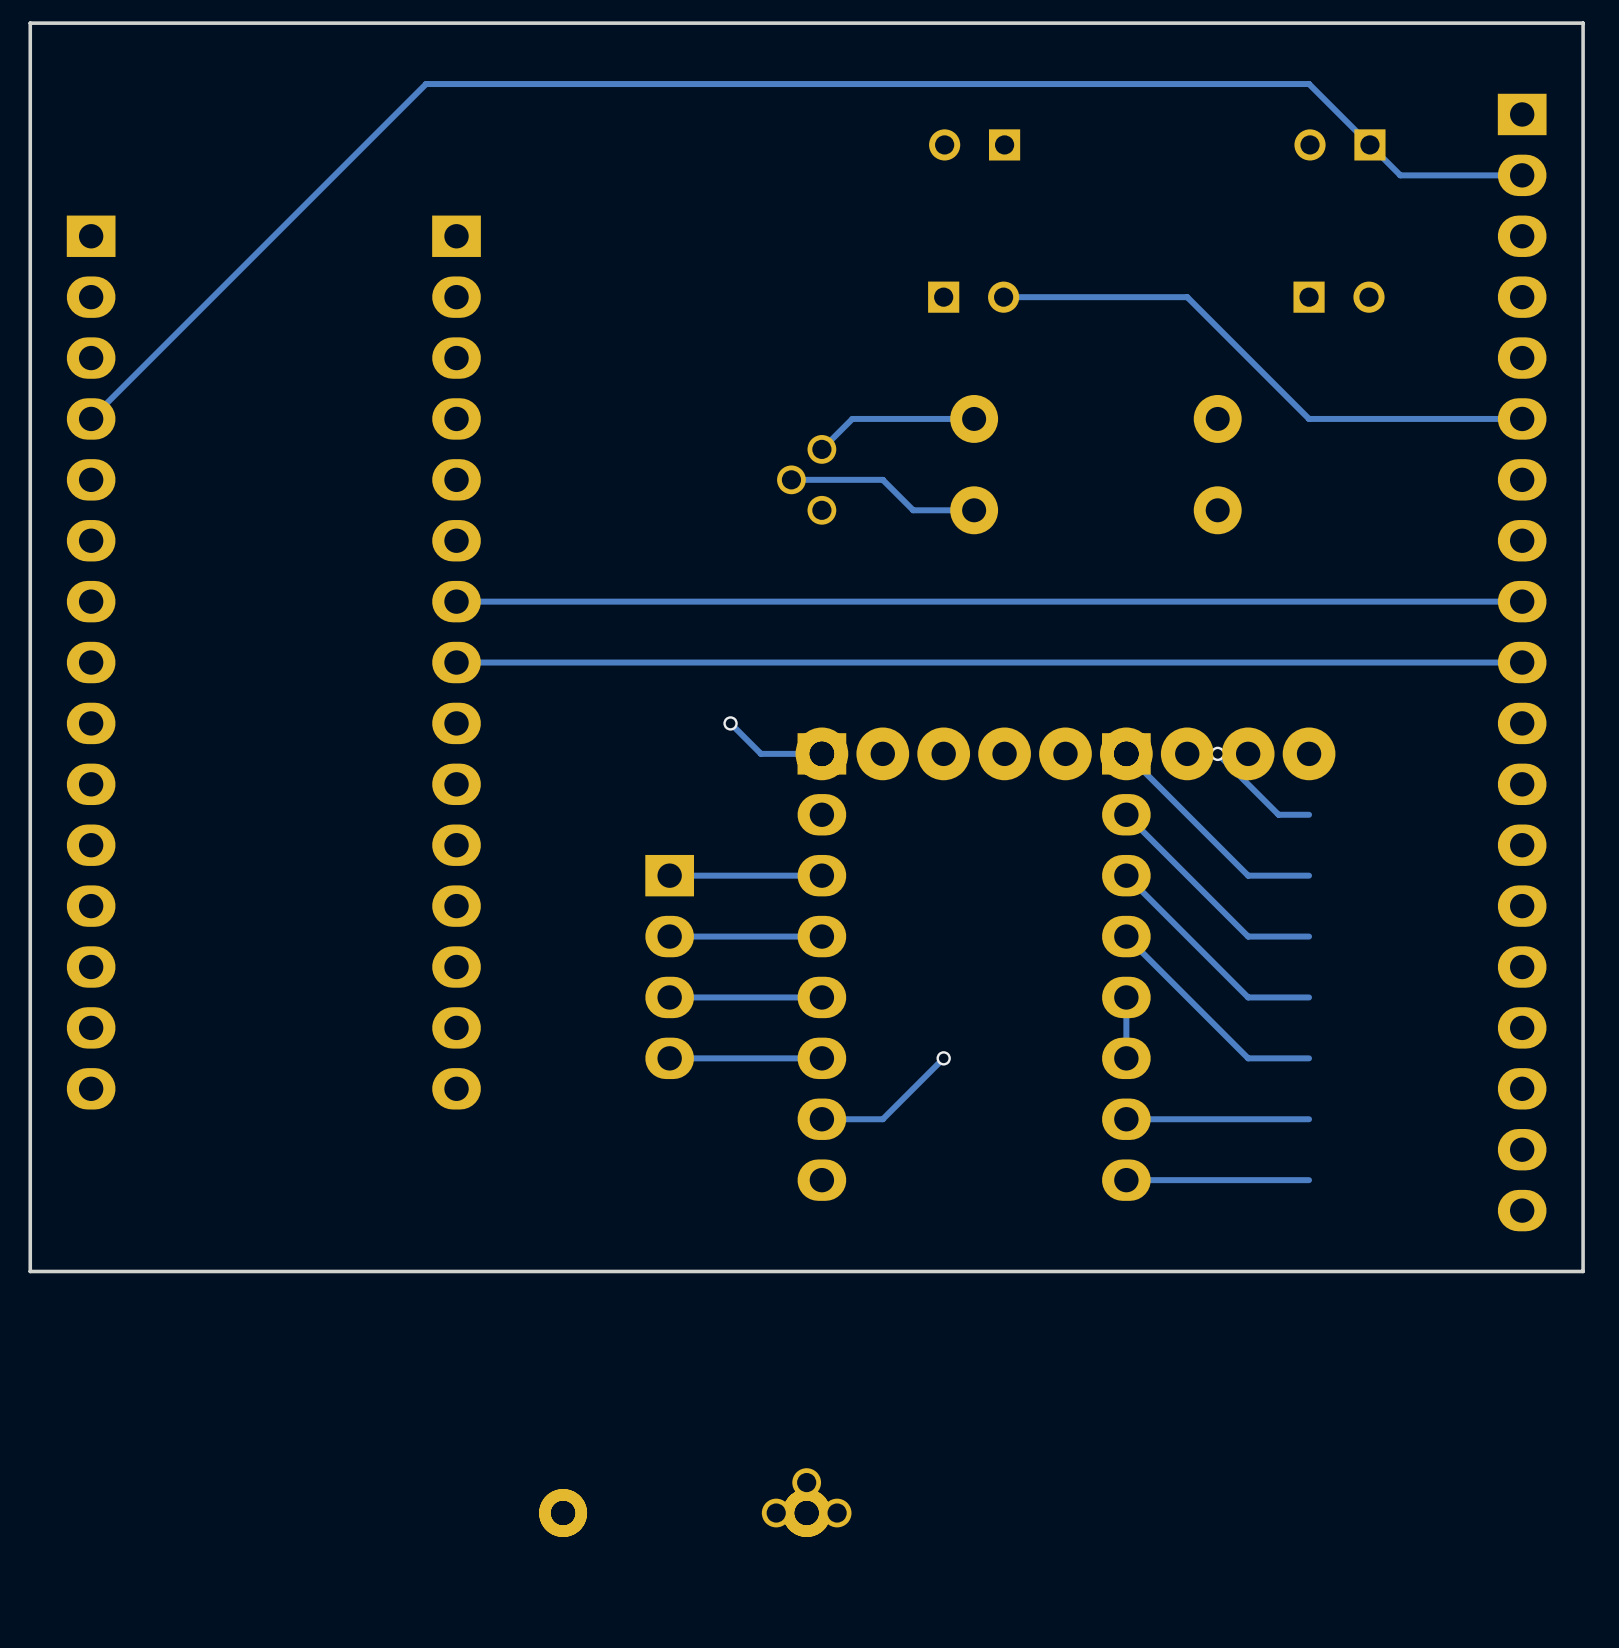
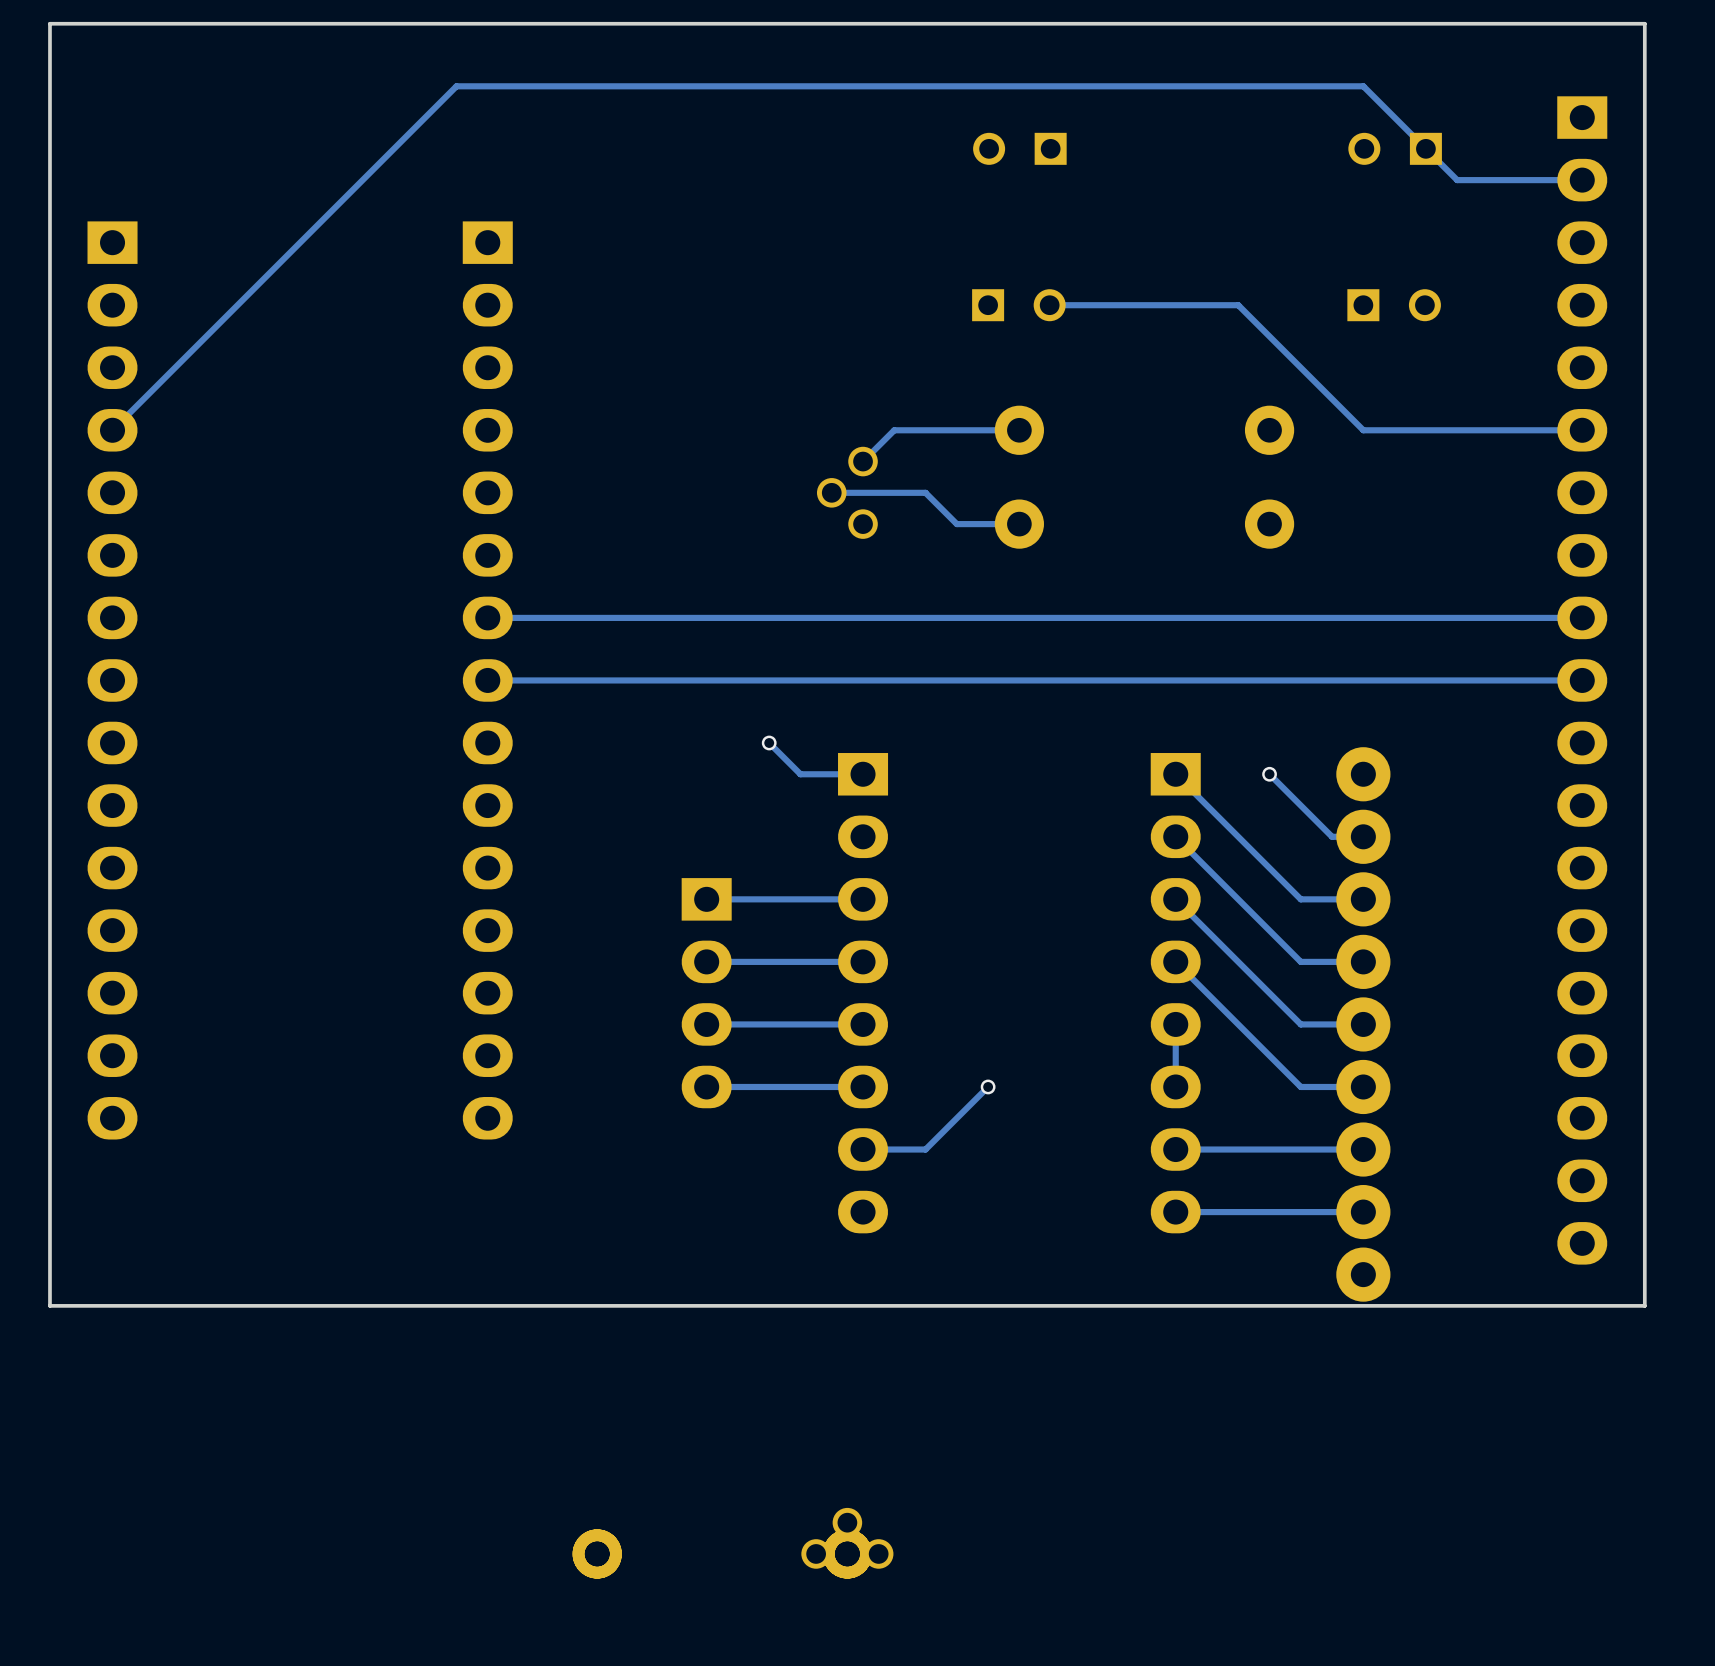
part rotation: 0° (1065, 753) -> 90° clockwise (1363, 1024)
part position: (1065, 753) -> (1363, 1024)

